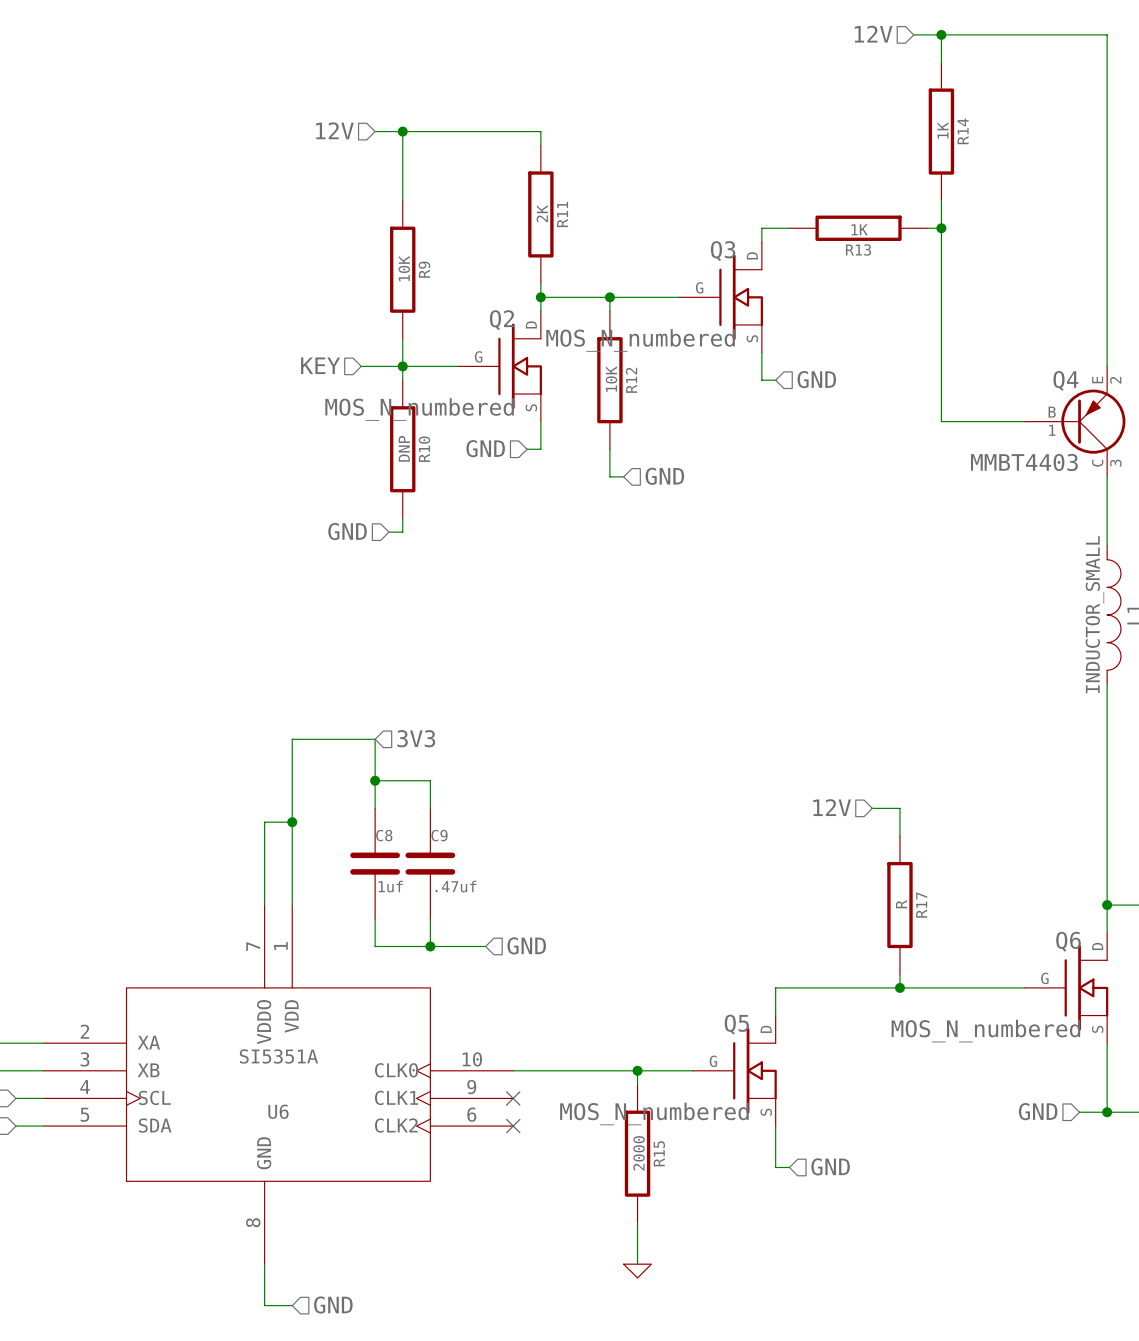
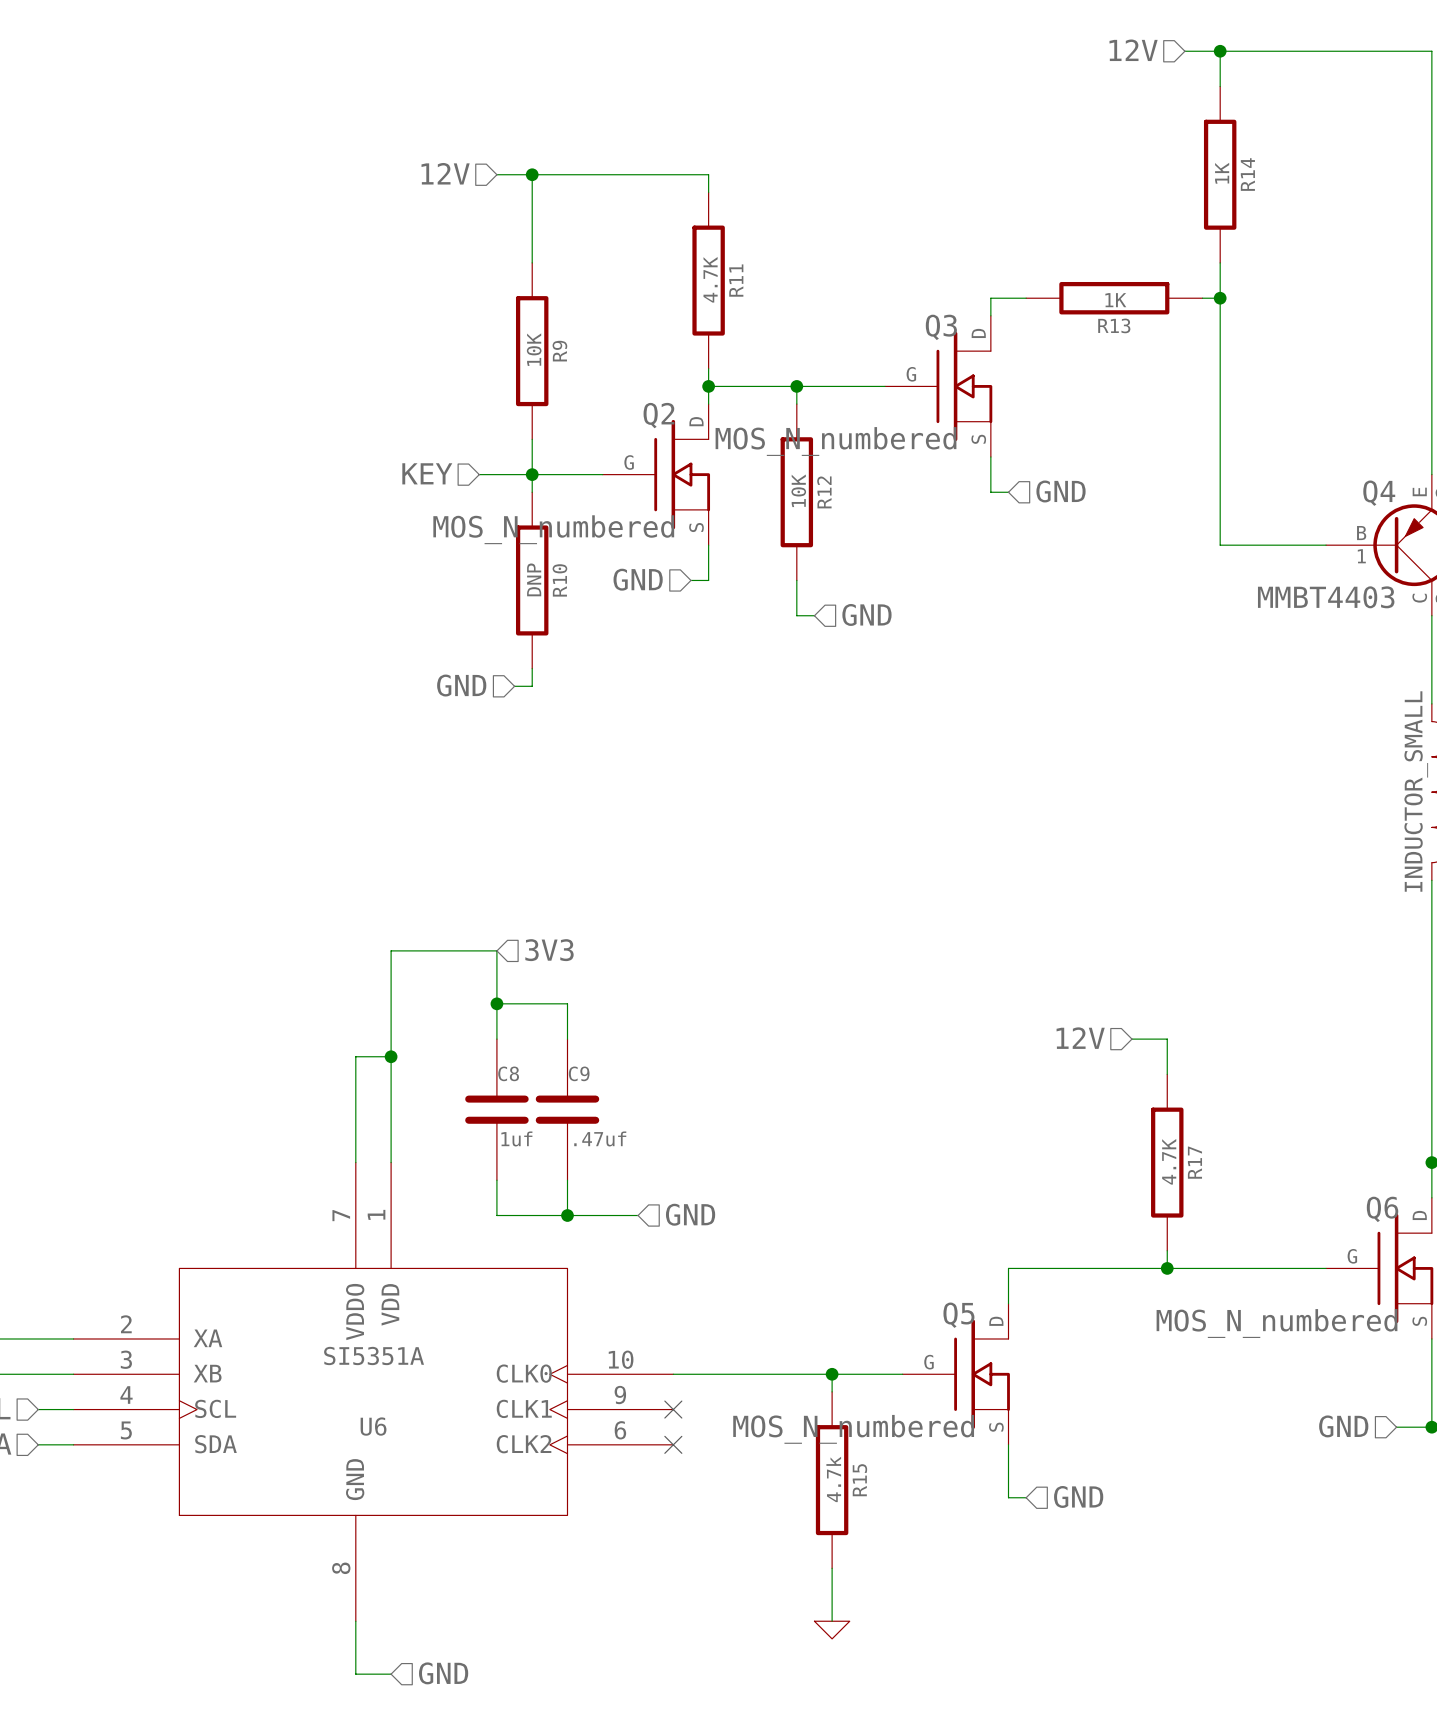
R11 value: 2K (542, 213) -> 4.7K (710, 279)
R17 value: R (901, 904) -> 4.7K (1169, 1161)
R15 value: 2000 (639, 1153) -> 4.7k (833, 1479)

